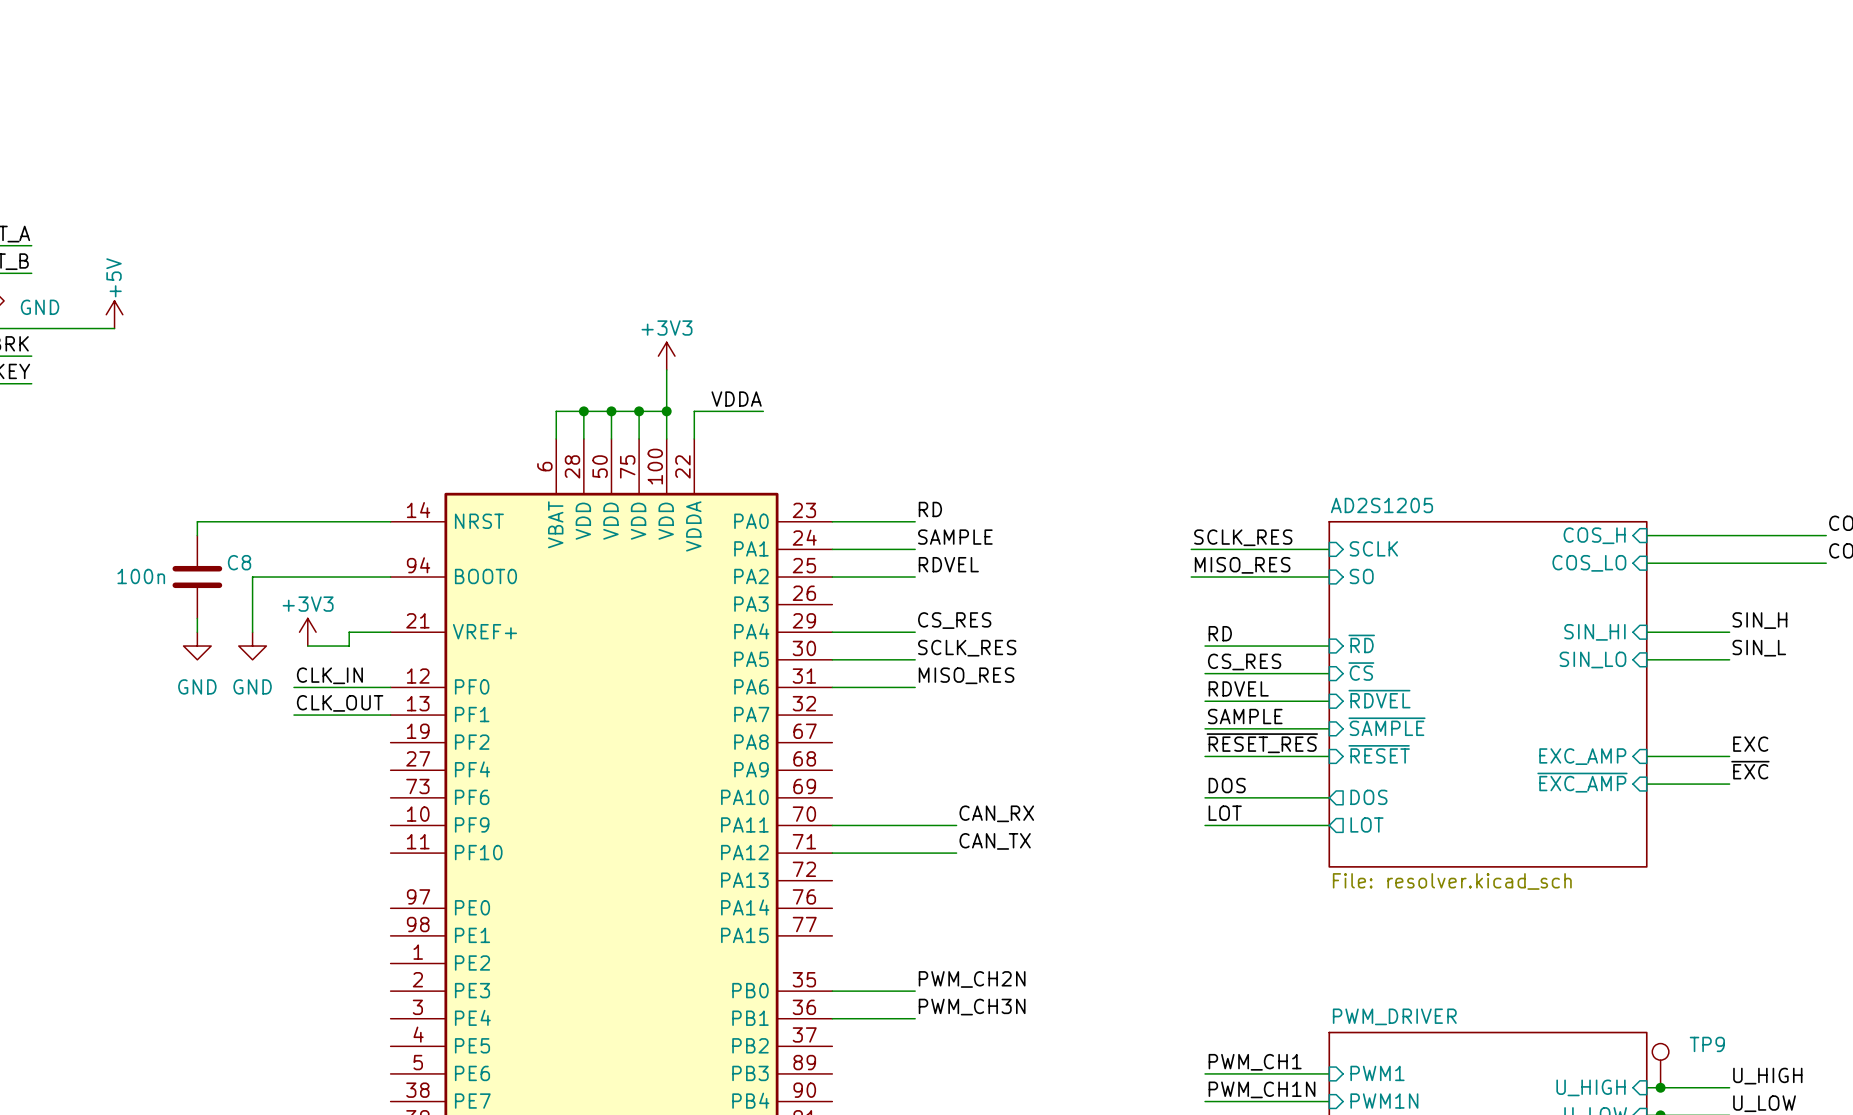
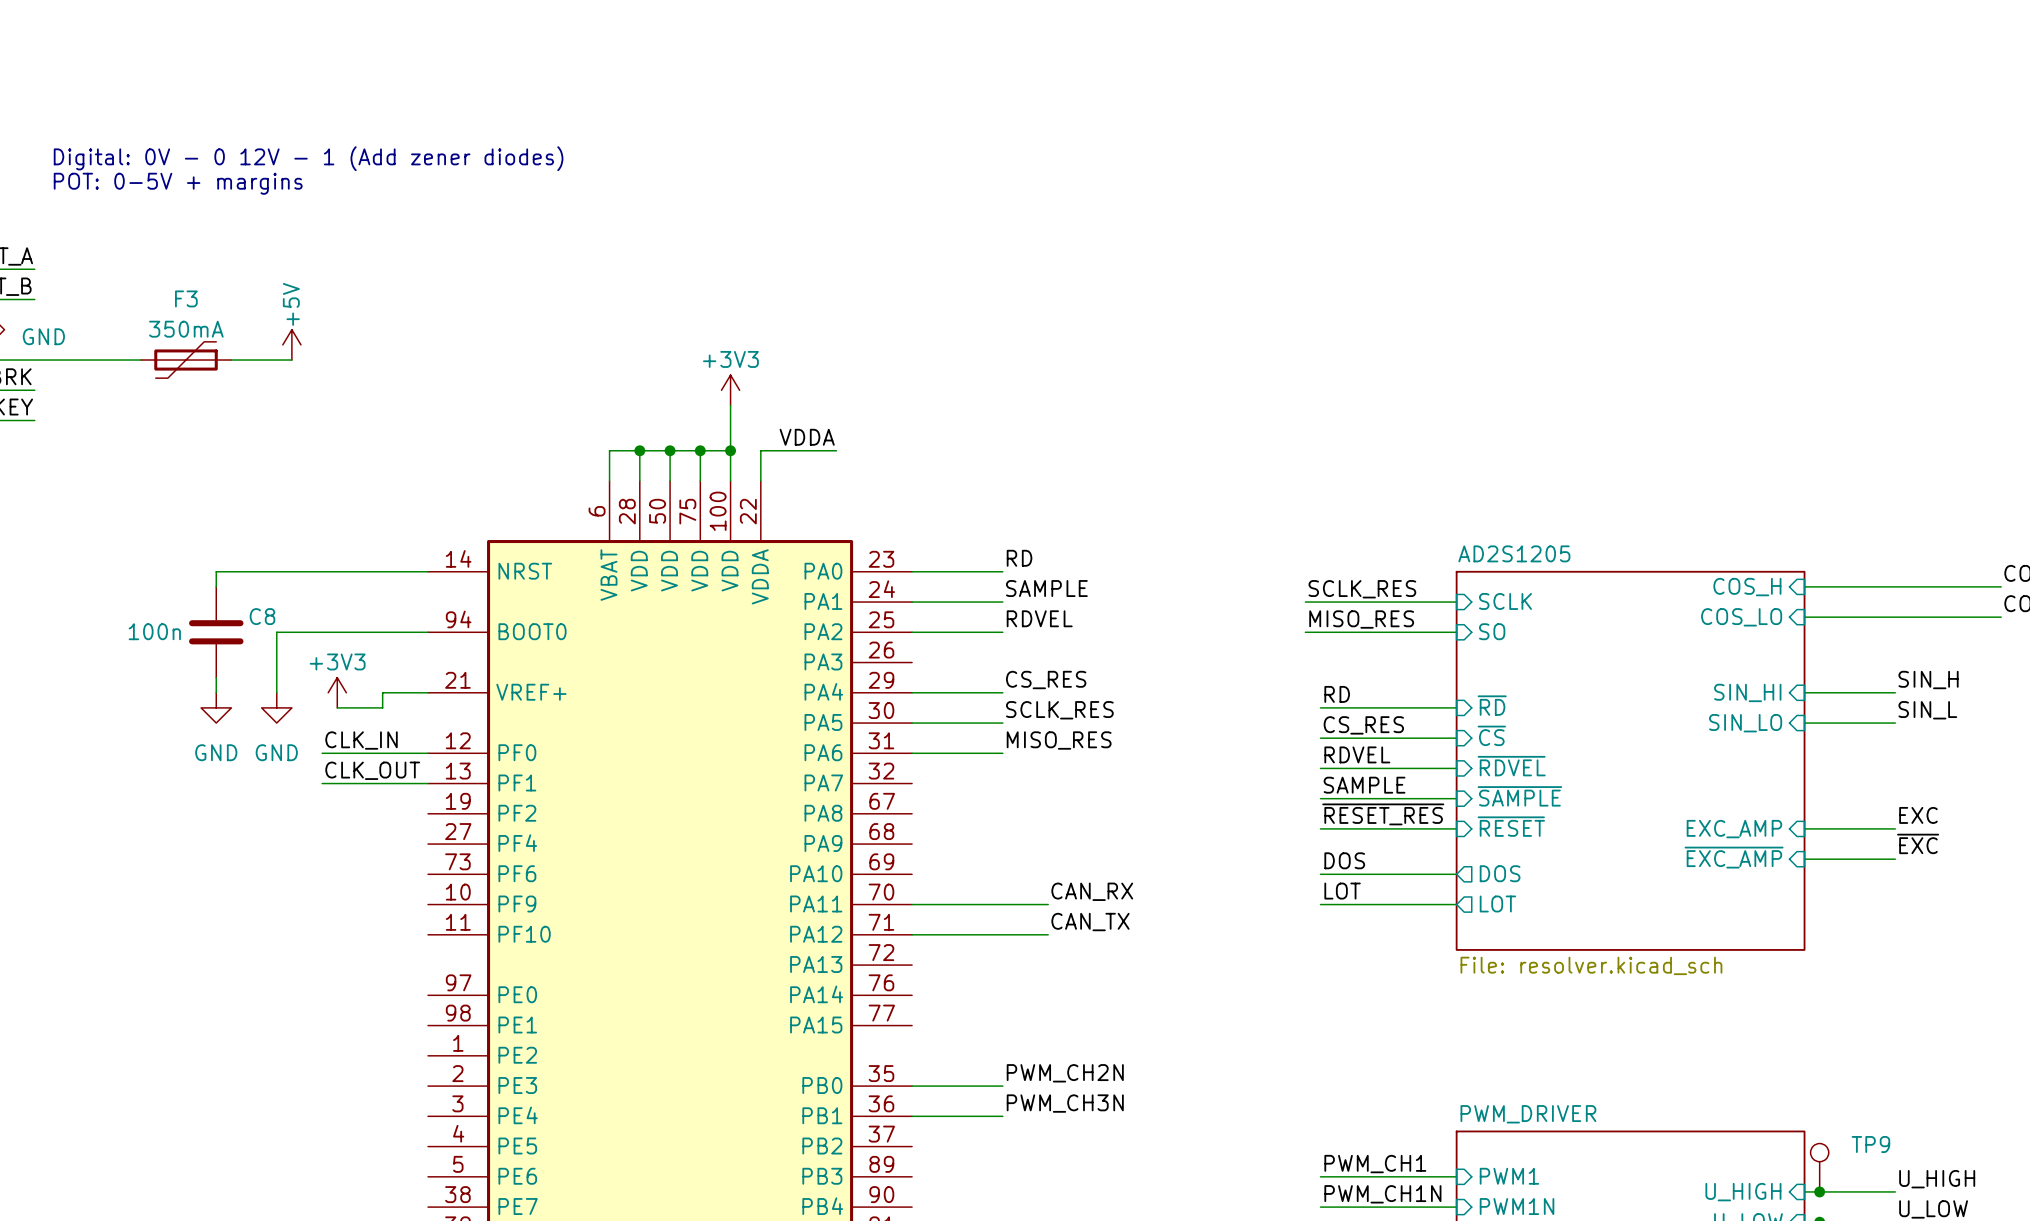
text: none -> Digital: 0V - 0 12V - 1 (Add zener diodes) (308, 158)
text: none -> POT: 0-5V + margins (178, 183)
power symbol position: +5V (114, 314) -> +5V (291, 344)
wire: none -> (125, 360) (140, 360)
F3: none -> 350mA (186, 360)
wire: none -> (231, 360) (291, 360)

